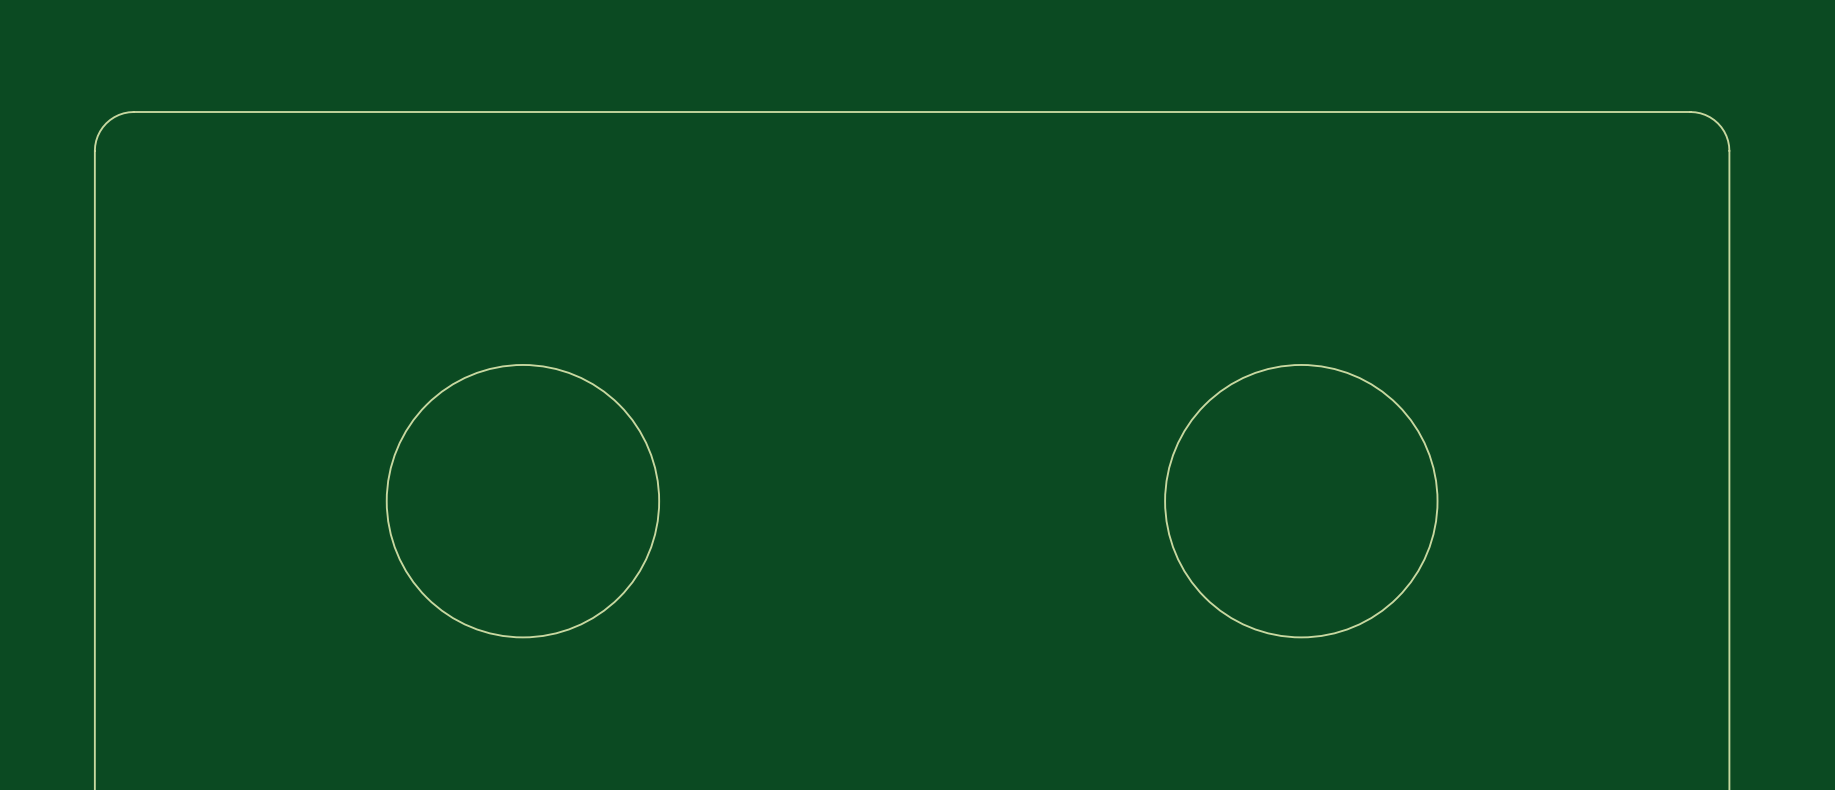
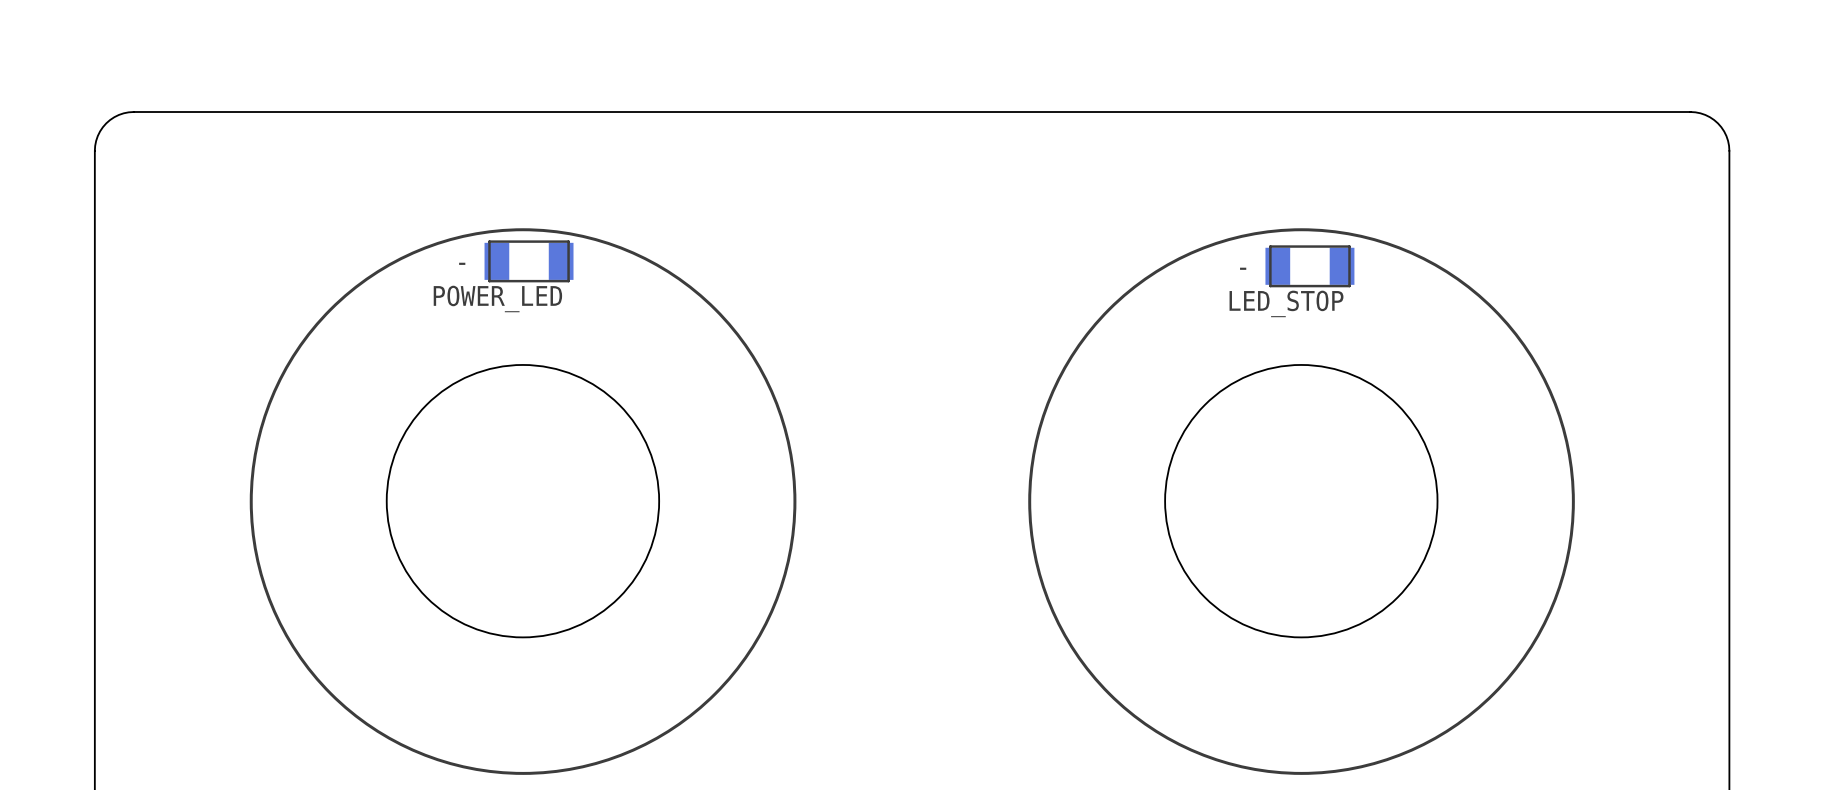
drawing: none -> [249, 228, 797, 775]
drawing: none -> [1028, 228, 1575, 775]
POWER_LED: none -> (529, 261)
text: none -> - (462, 263)
LED_STOP: none -> (1309, 266)
text: none -> - (1243, 268)

